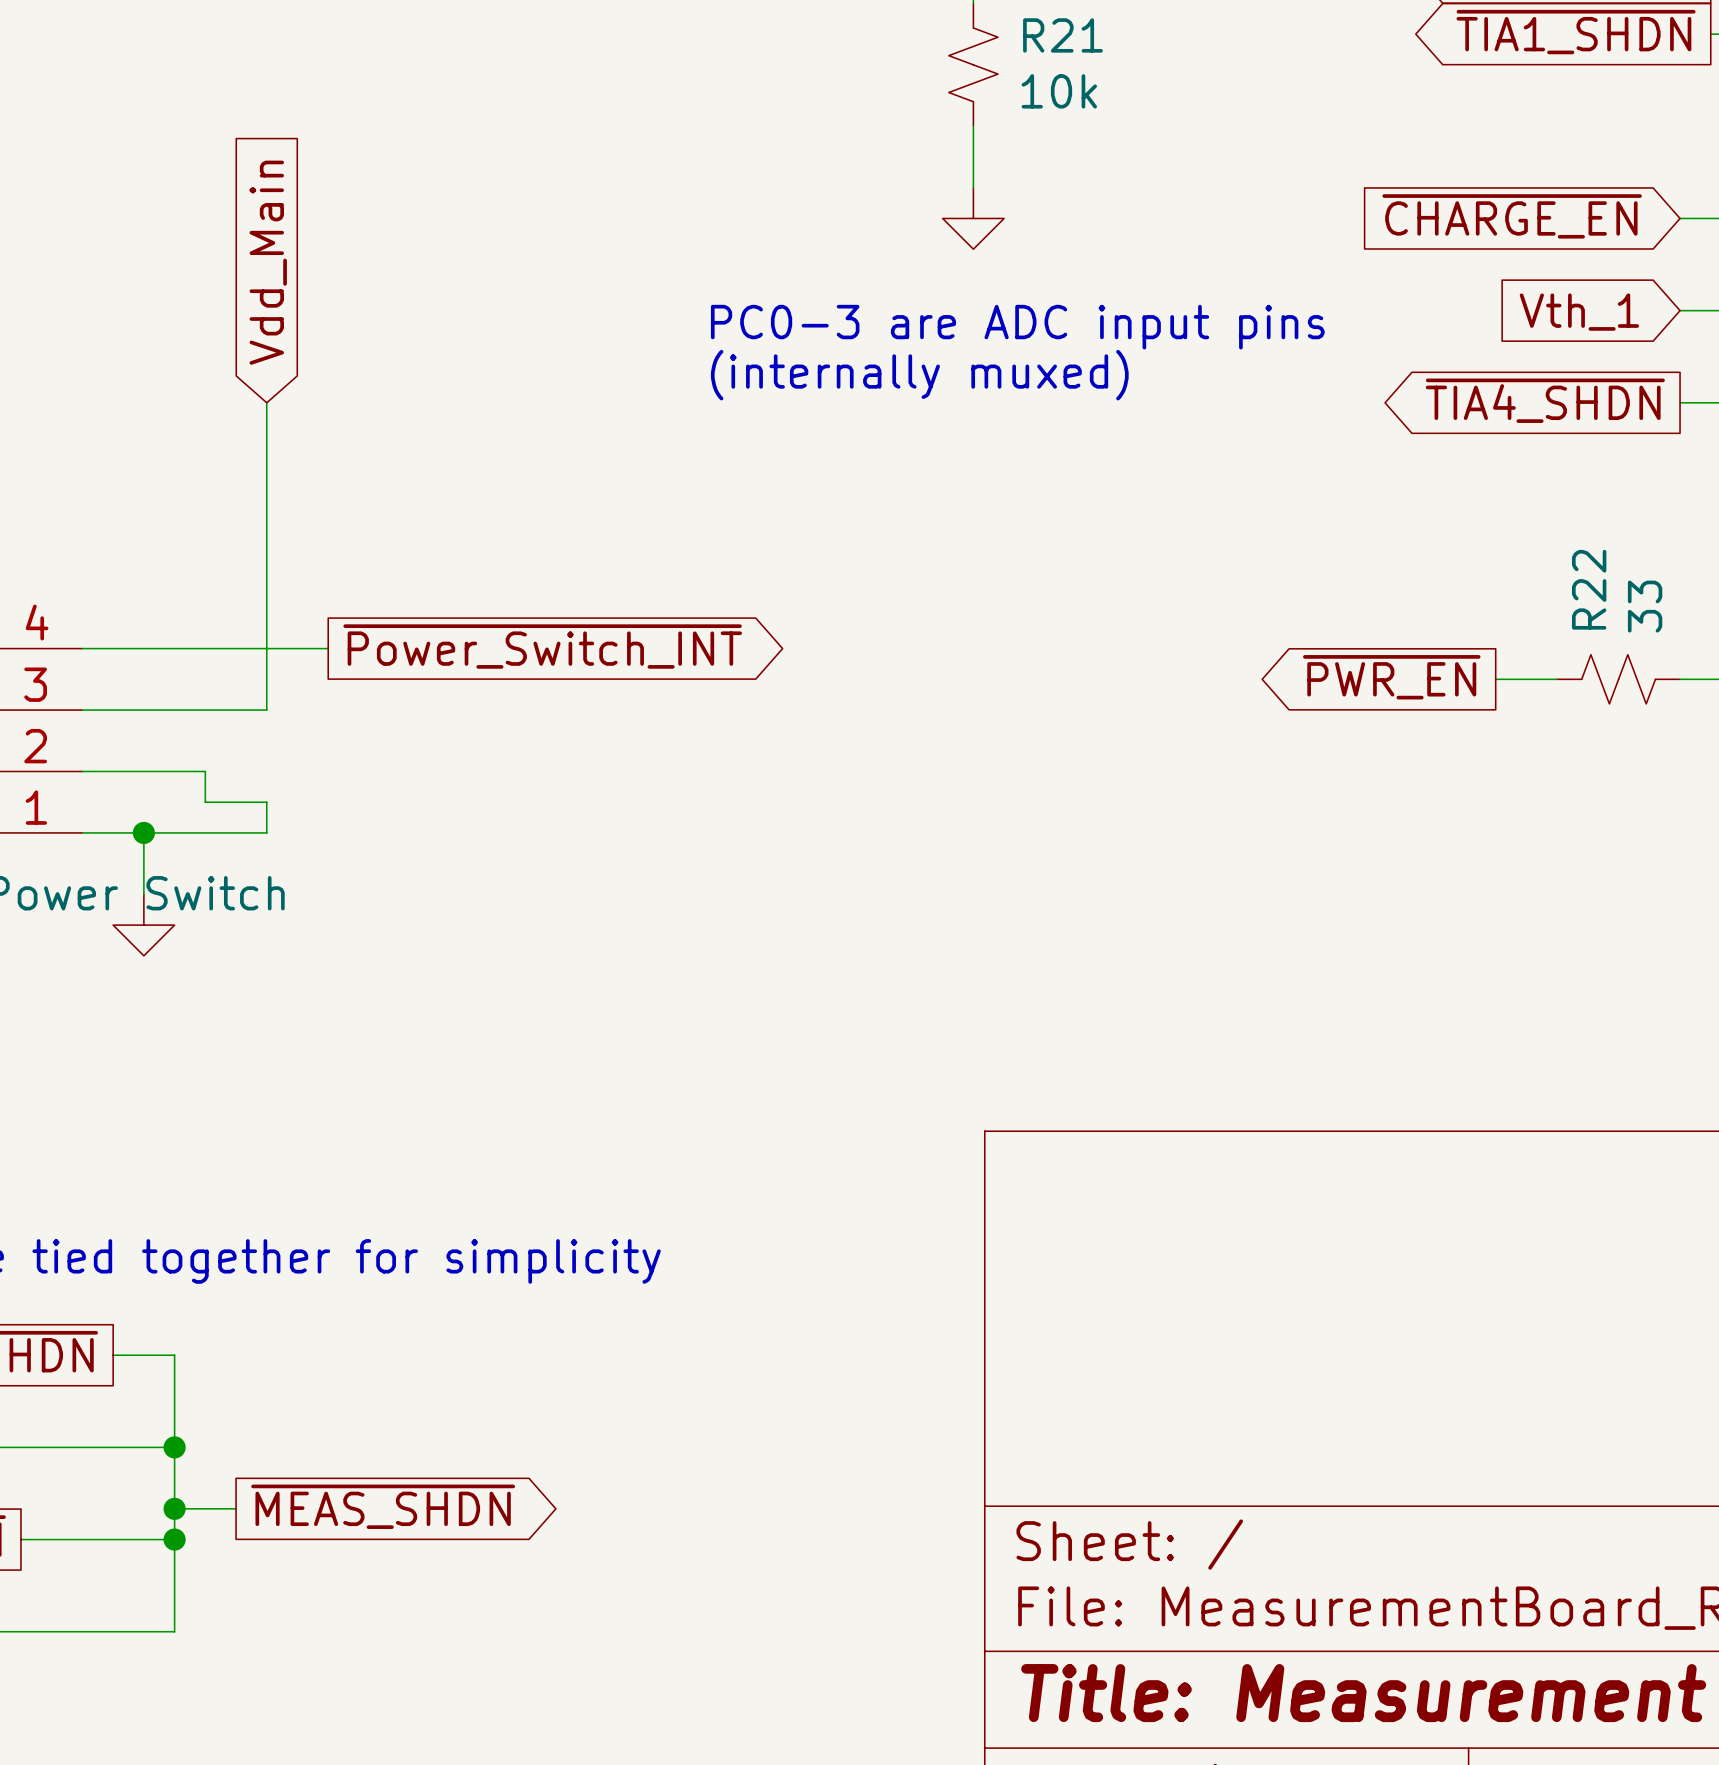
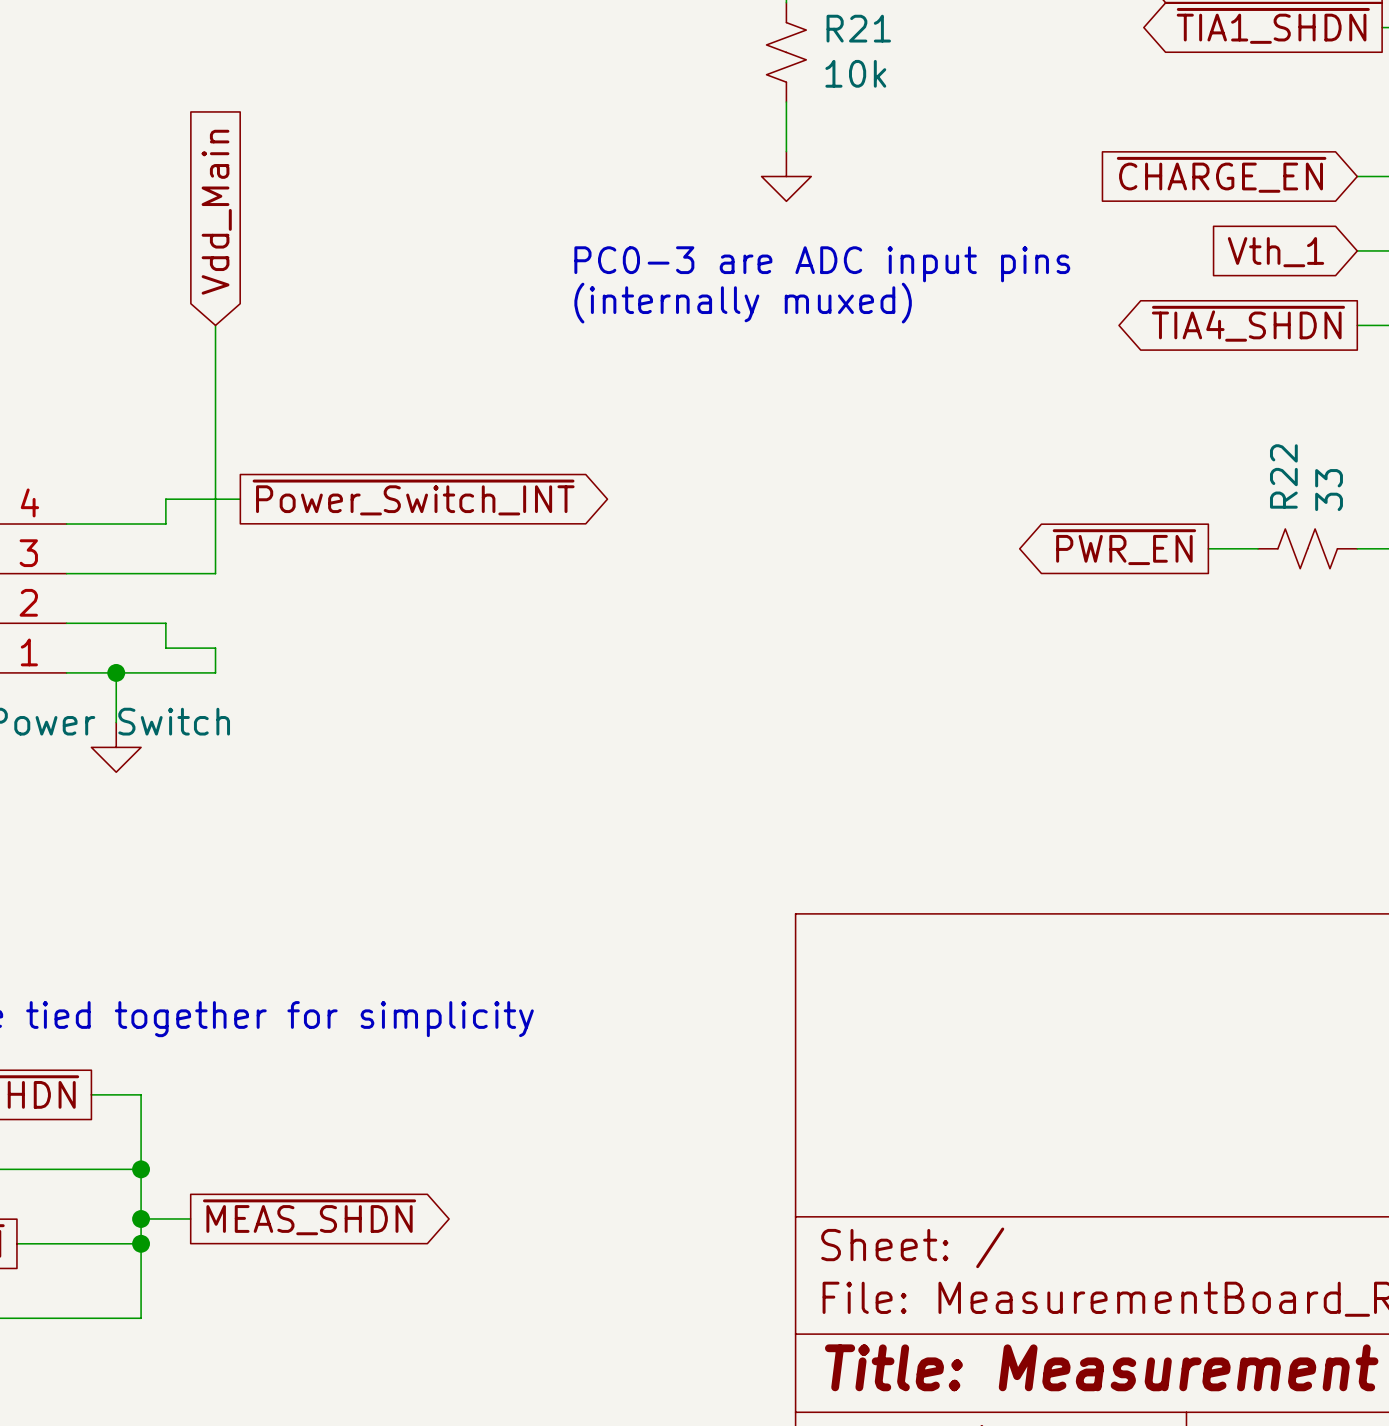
global label position: ~{Power_Switch_INT} (542, 646) -> ~{Power_Switch_INT} (413, 497)
wire: (205, 648) (328, 648) -> (165, 524) (165, 499) (240, 499)

